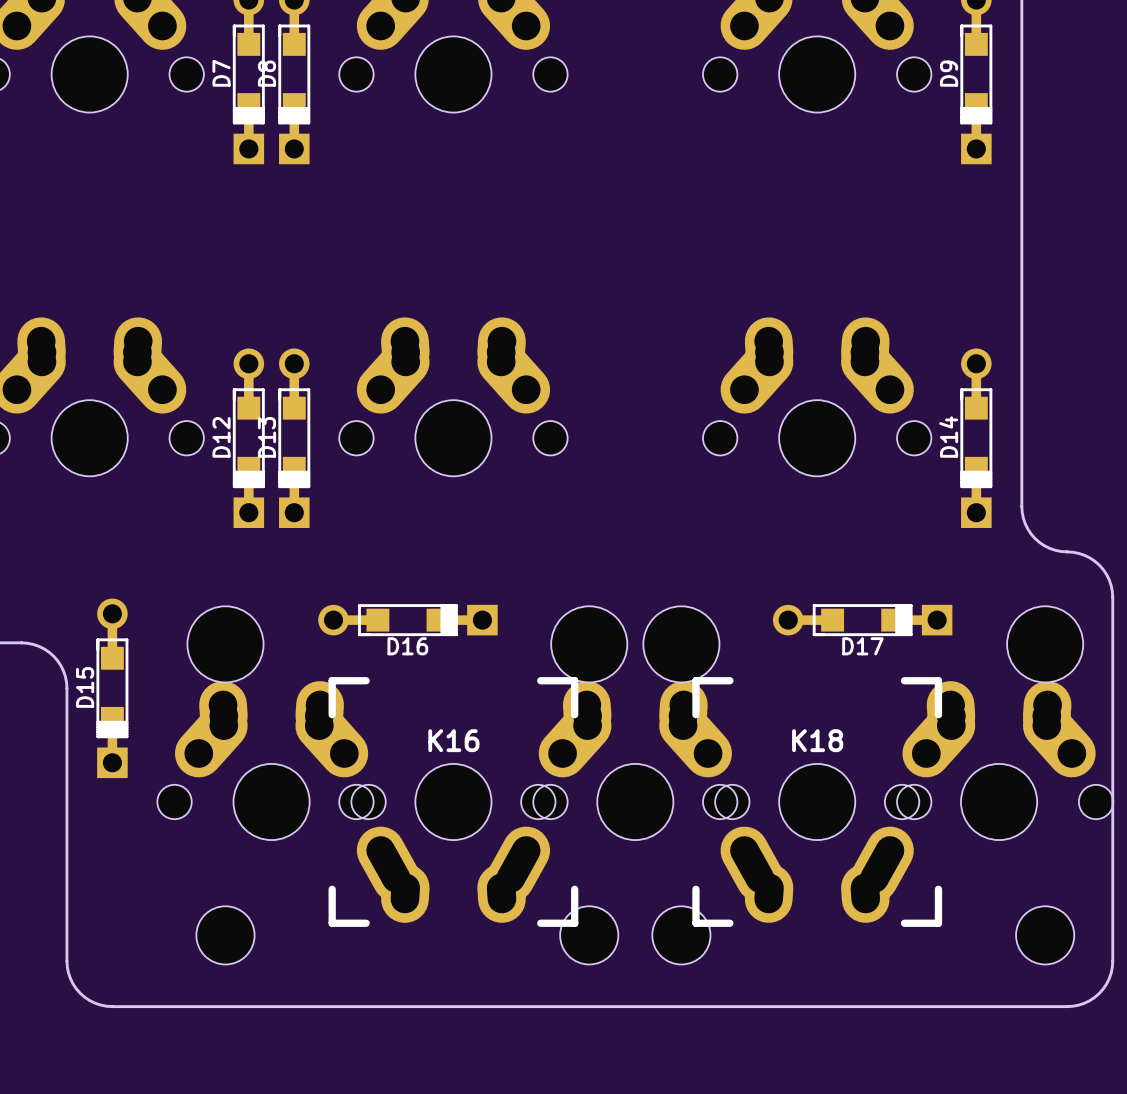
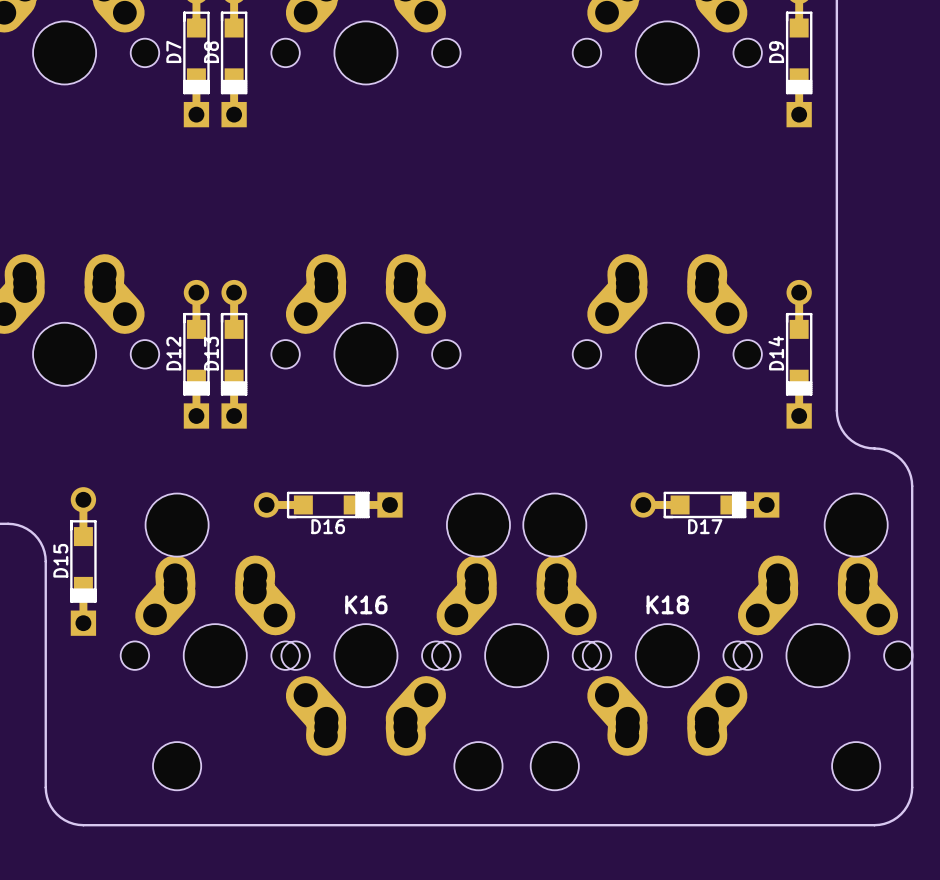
K16 footprint: [187, 606, 720, 965] -> [145, 493, 587, 791]
K18 footprint: [551, 606, 1084, 965] -> [446, 493, 888, 791]

